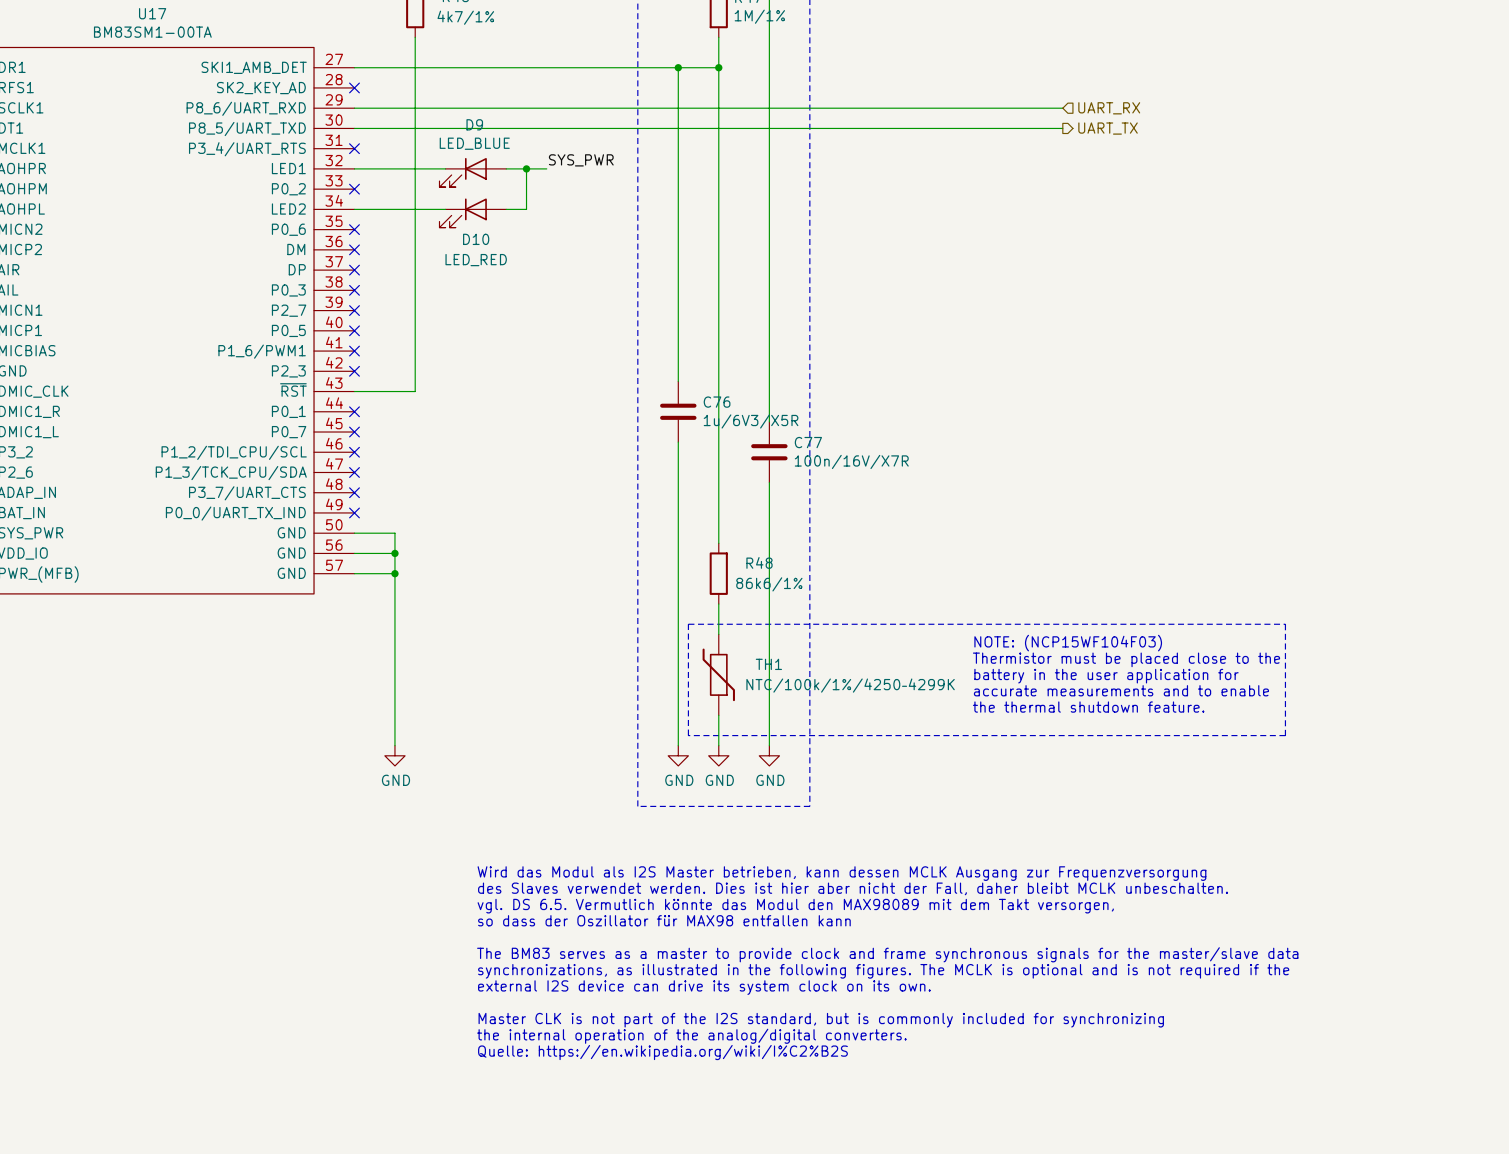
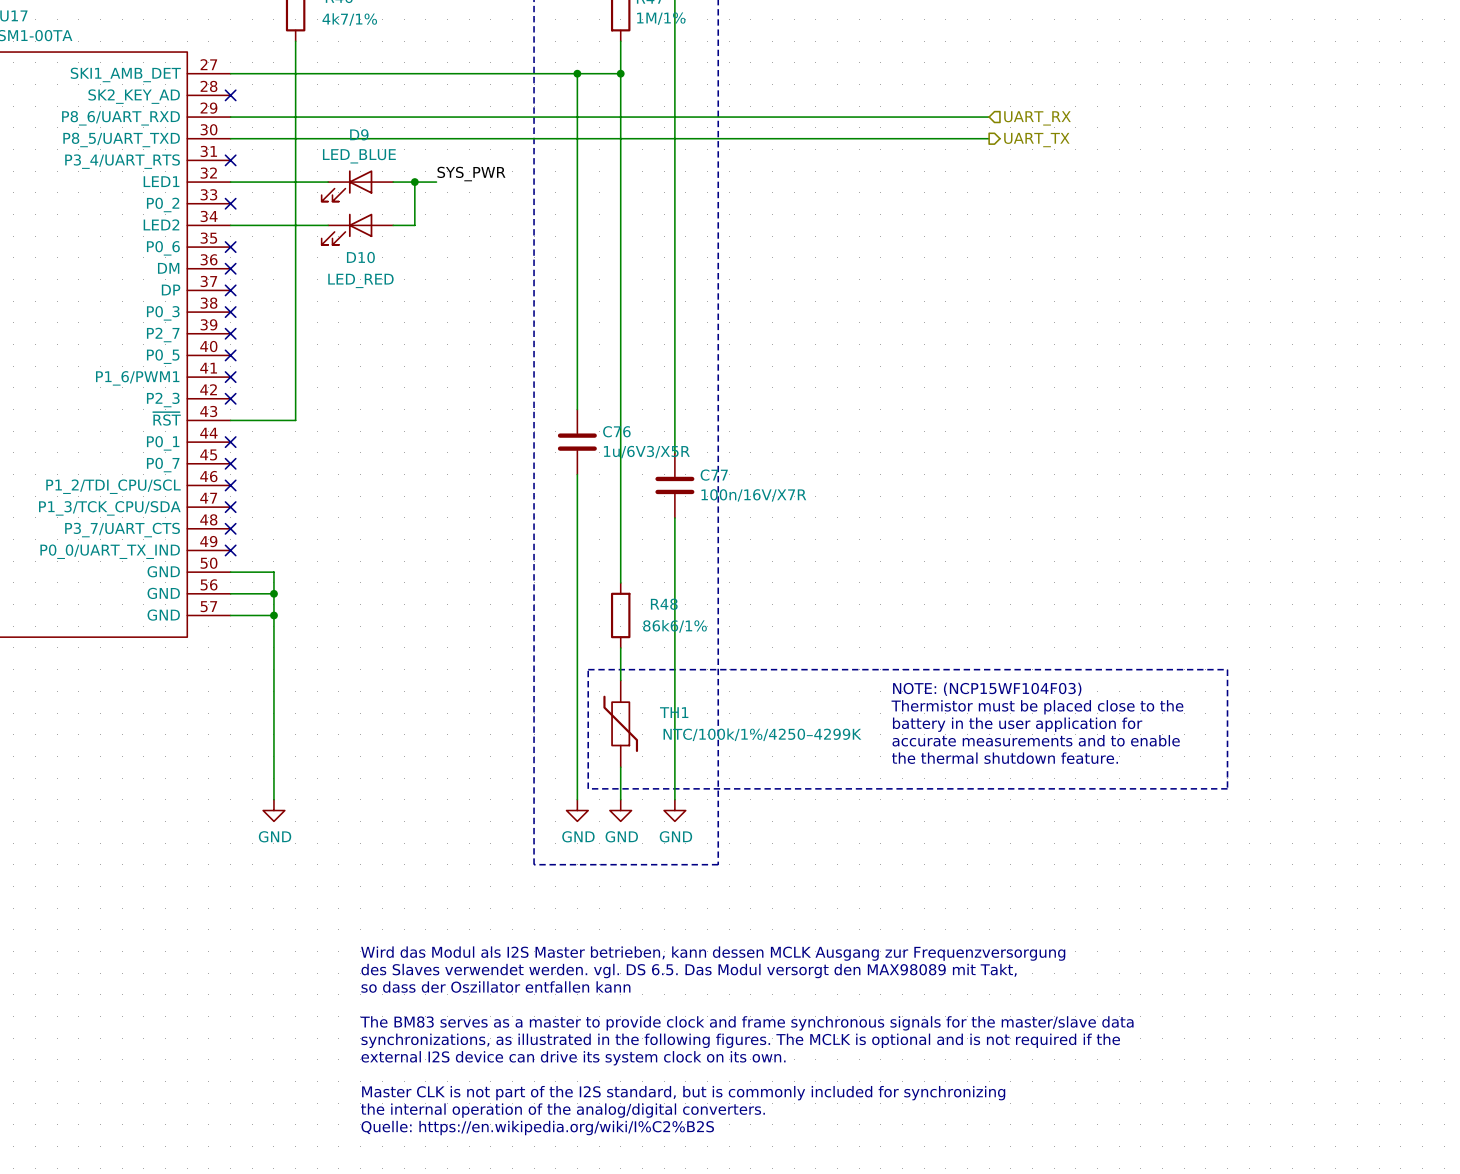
text: Wird das Modul als I2S Master betrieben, kann dessen MCLK Ausgang zur Frequenzversorgung (841, 873) -> none
text: des Slaves verwendet werden. Dies ist hier aber nicht der Fall, daher bleibt MCLK unbeschalten. (853, 888) -> Wird das Modul als I2S Master betrieben, kann dessen MCLK Ausgang zur Frequenzversorgung (713, 953)
text: vgl. DS 6.5. Vermutlich könnte das Modul den MAX98089 mit dem Takt versorgen, (795, 906) -> des Slaves verwendet werden. vgl. DS 6.5. Das Modul versorgt den MAX98089 mit Takt, (689, 971)
text: so dass der Oszillator für MAX98 entfallen kann (664, 920) -> so dass der Oszillator entfallen kann (495, 987)

